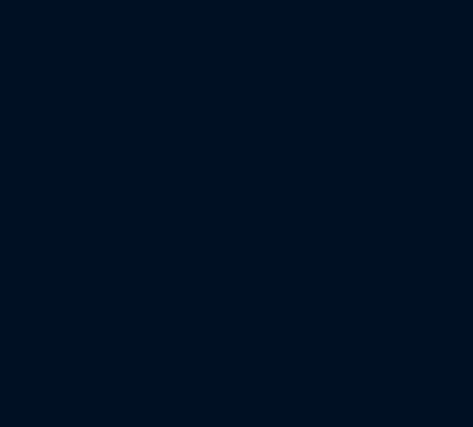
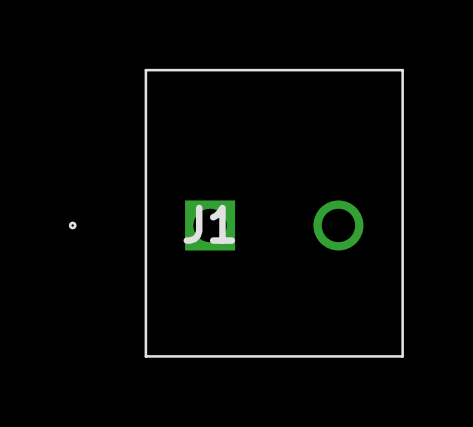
J1: none -> (236, 213)

